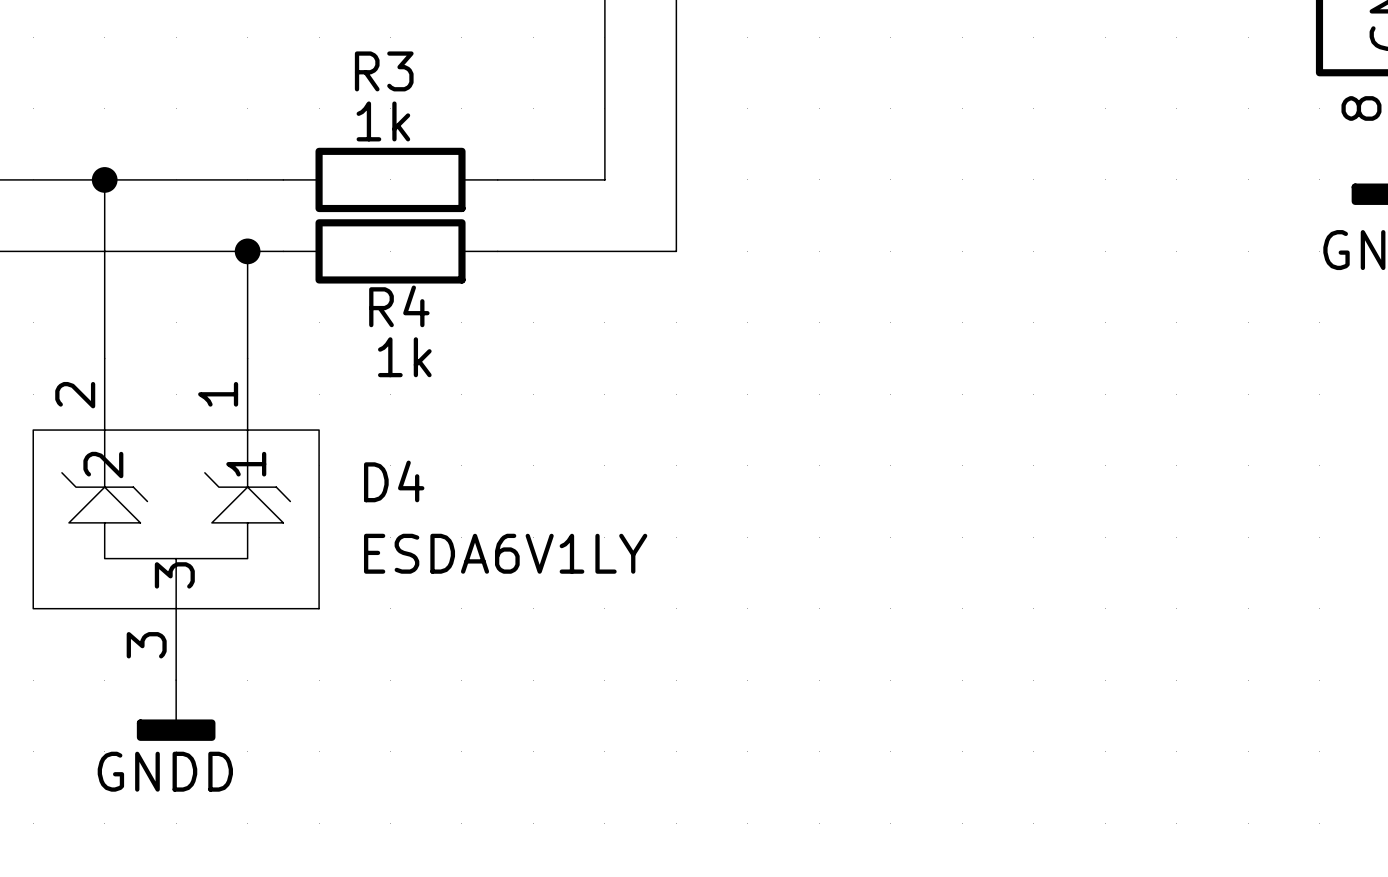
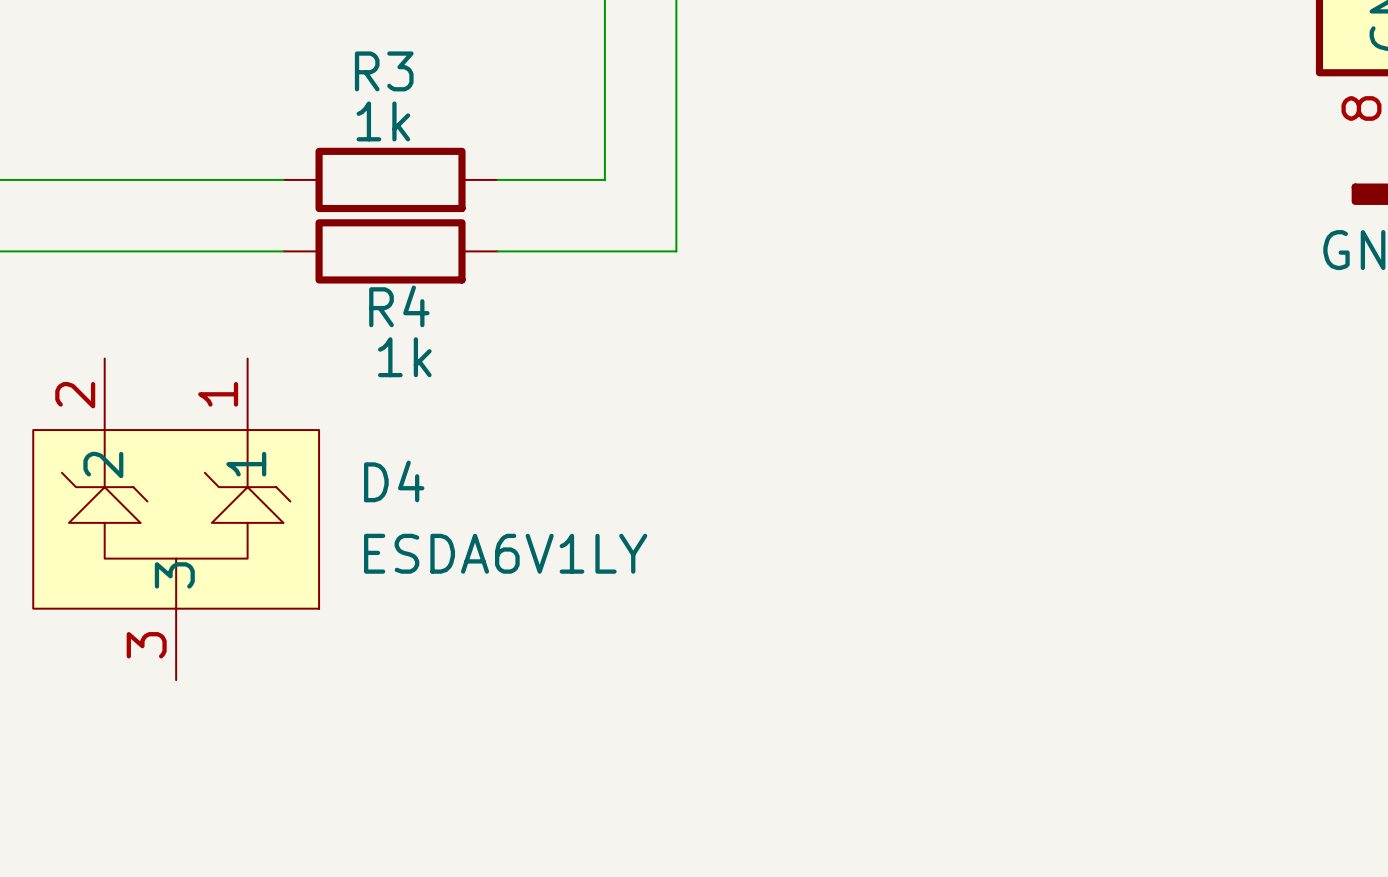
wire: (104, 179) (104, 358) -> none
junction: (104, 179) -> none
wire: (247, 251) (247, 358) -> none
junction: (247, 251) -> none
power symbol: GNDD (176, 710) -> none

